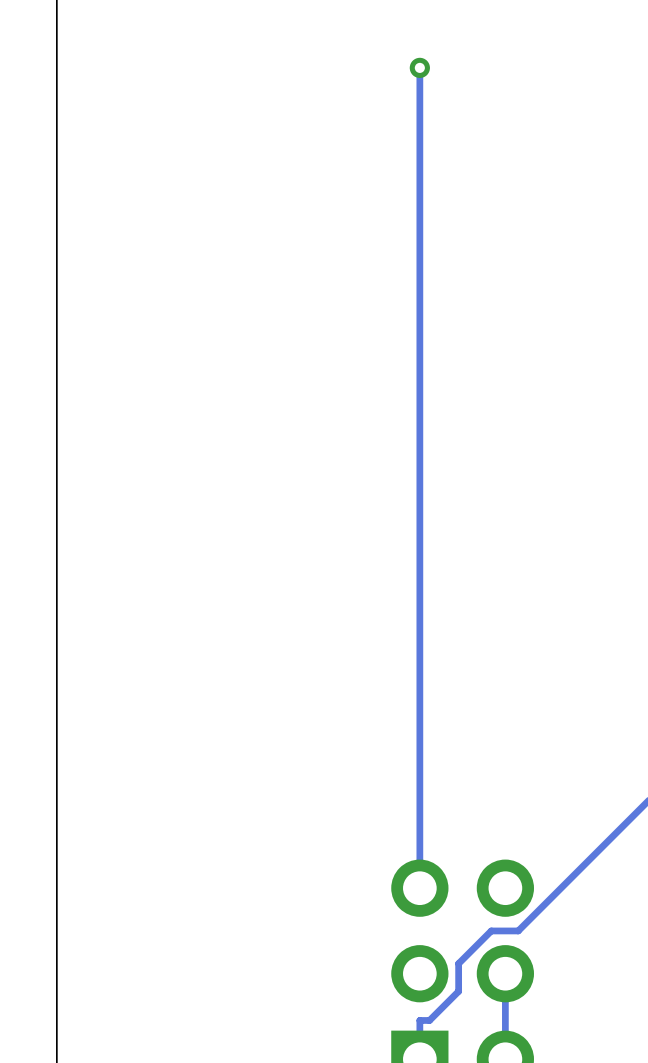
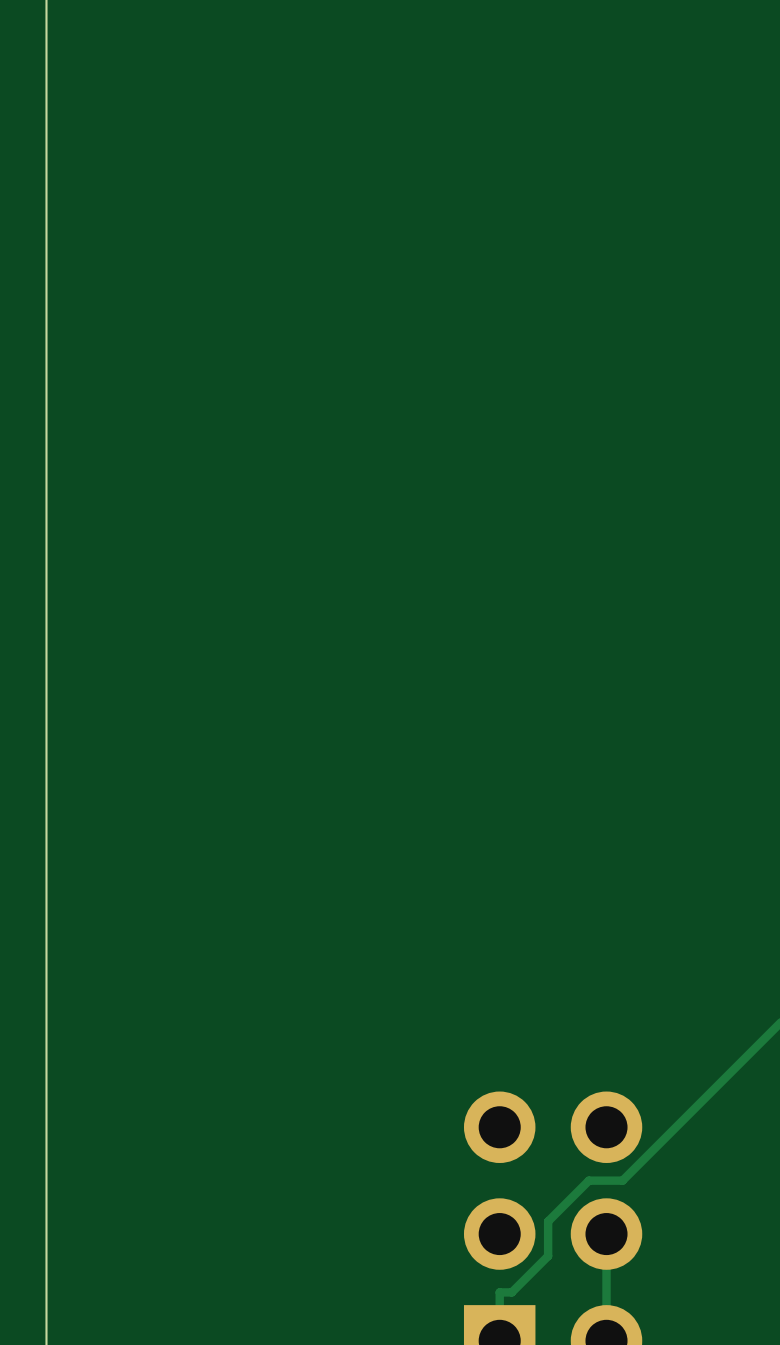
track: (419, 67) (419, 888) -> none
via: (419, 67) -> none

